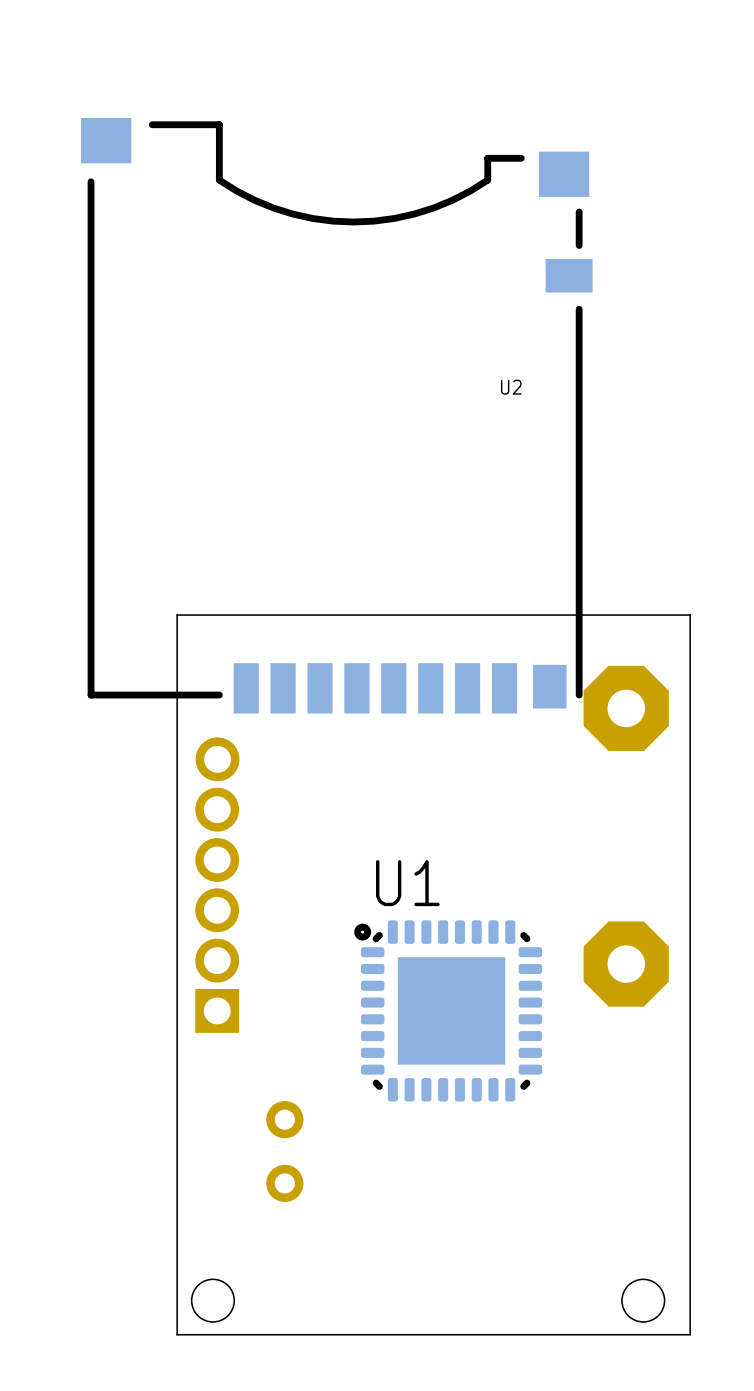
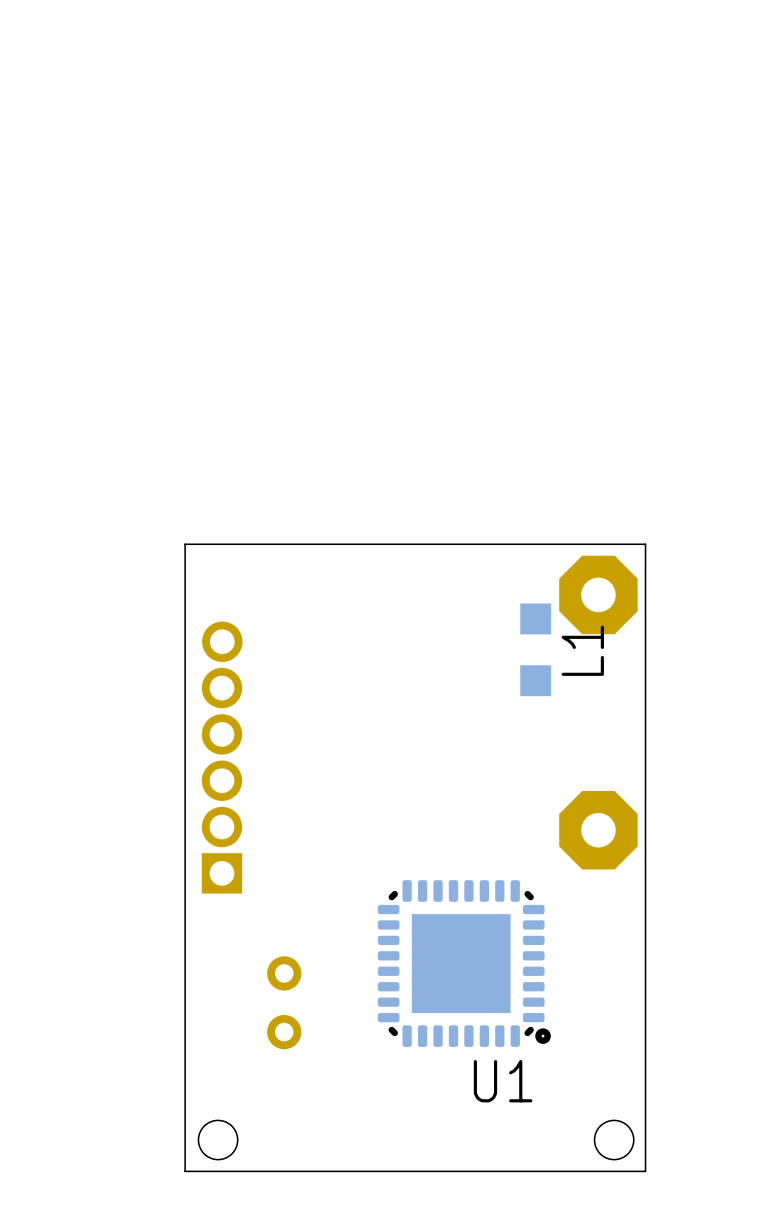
U2: (336, 415) -> none
board edge: (177, 653) (177, 615) (690, 615) (690, 1334) (677, 1334) -> (185, 544) (645, 544) (645, 1171)
L1: none -> (535, 649)
U1 rotation: 0° (448, 1010) -> 180° (464, 963)

